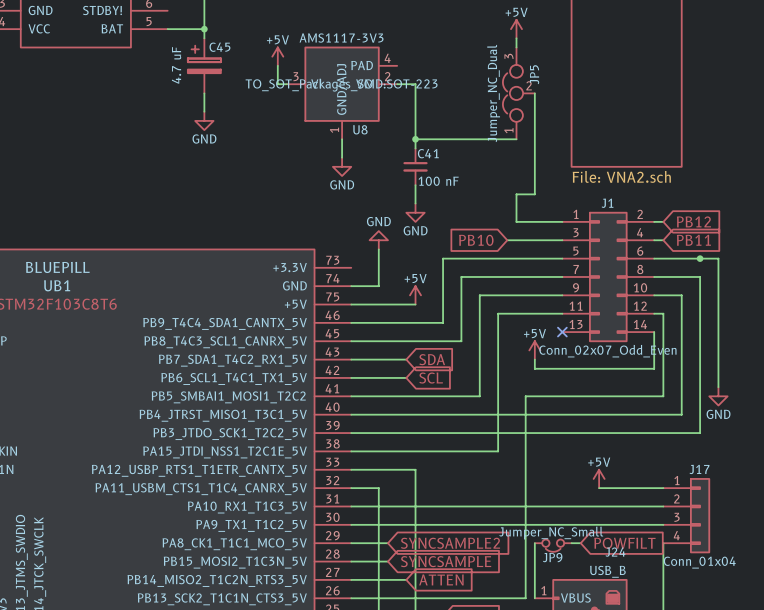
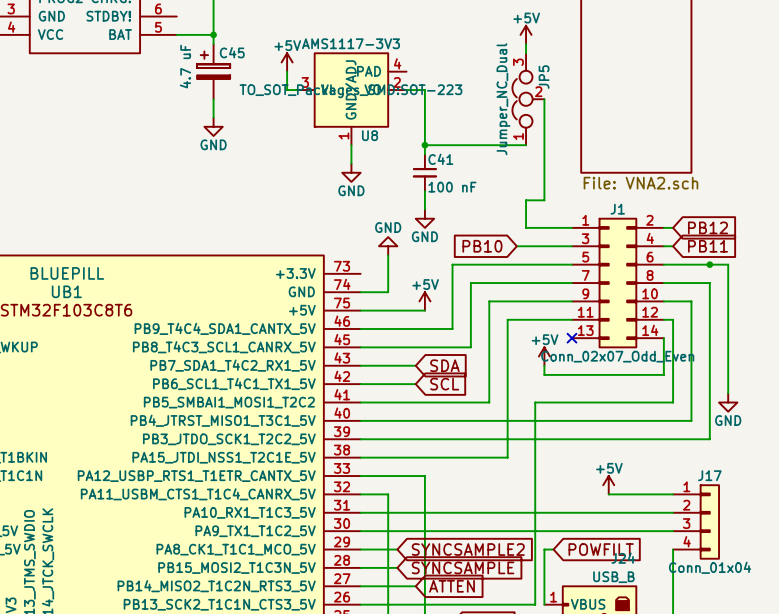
global label position: POWFILT (624, 543) -> POWFILT (601, 549)
JP9: Jumper_NC_Small (553, 545) -> none

